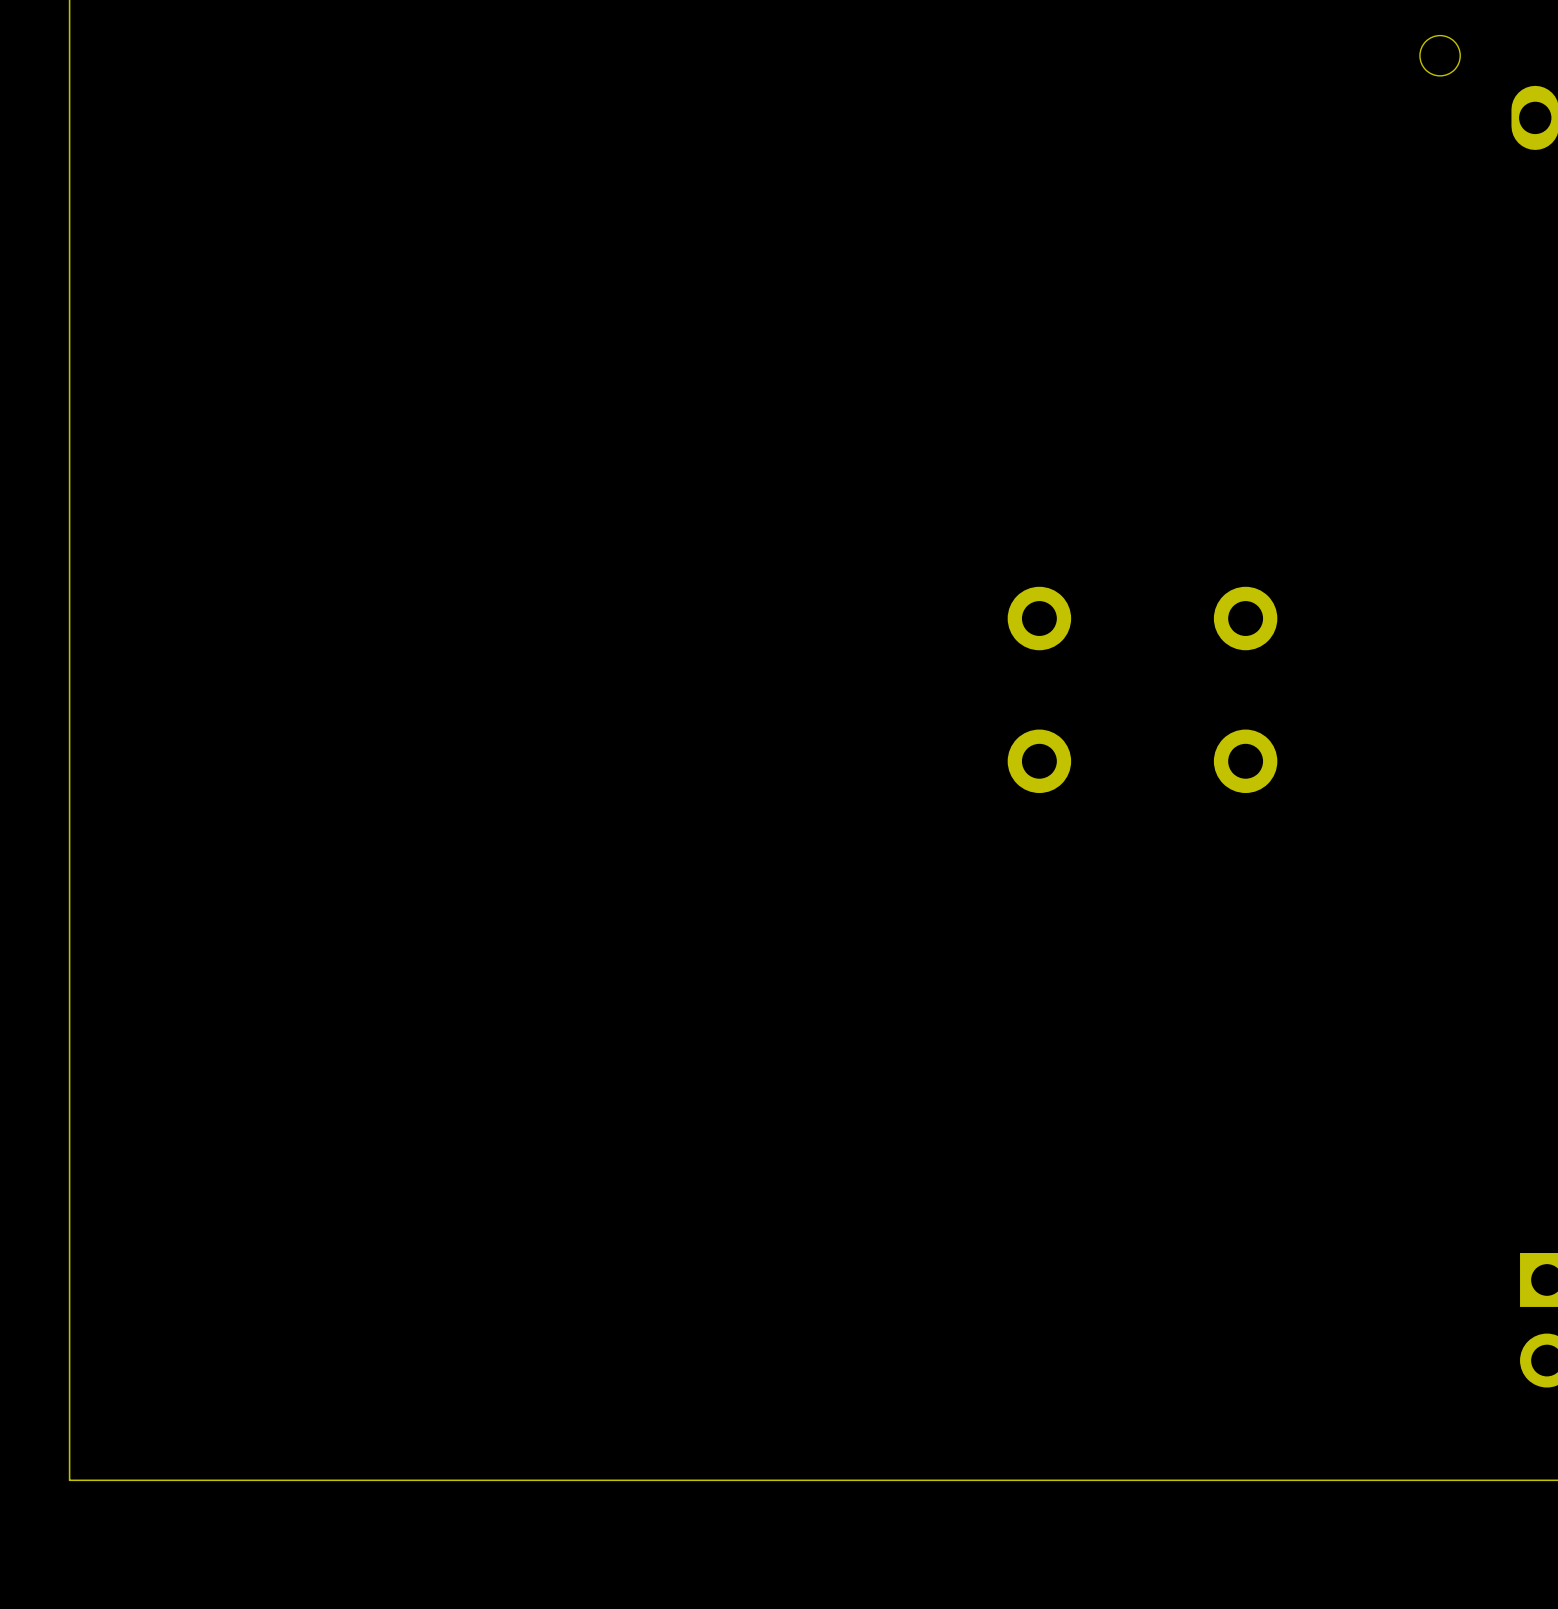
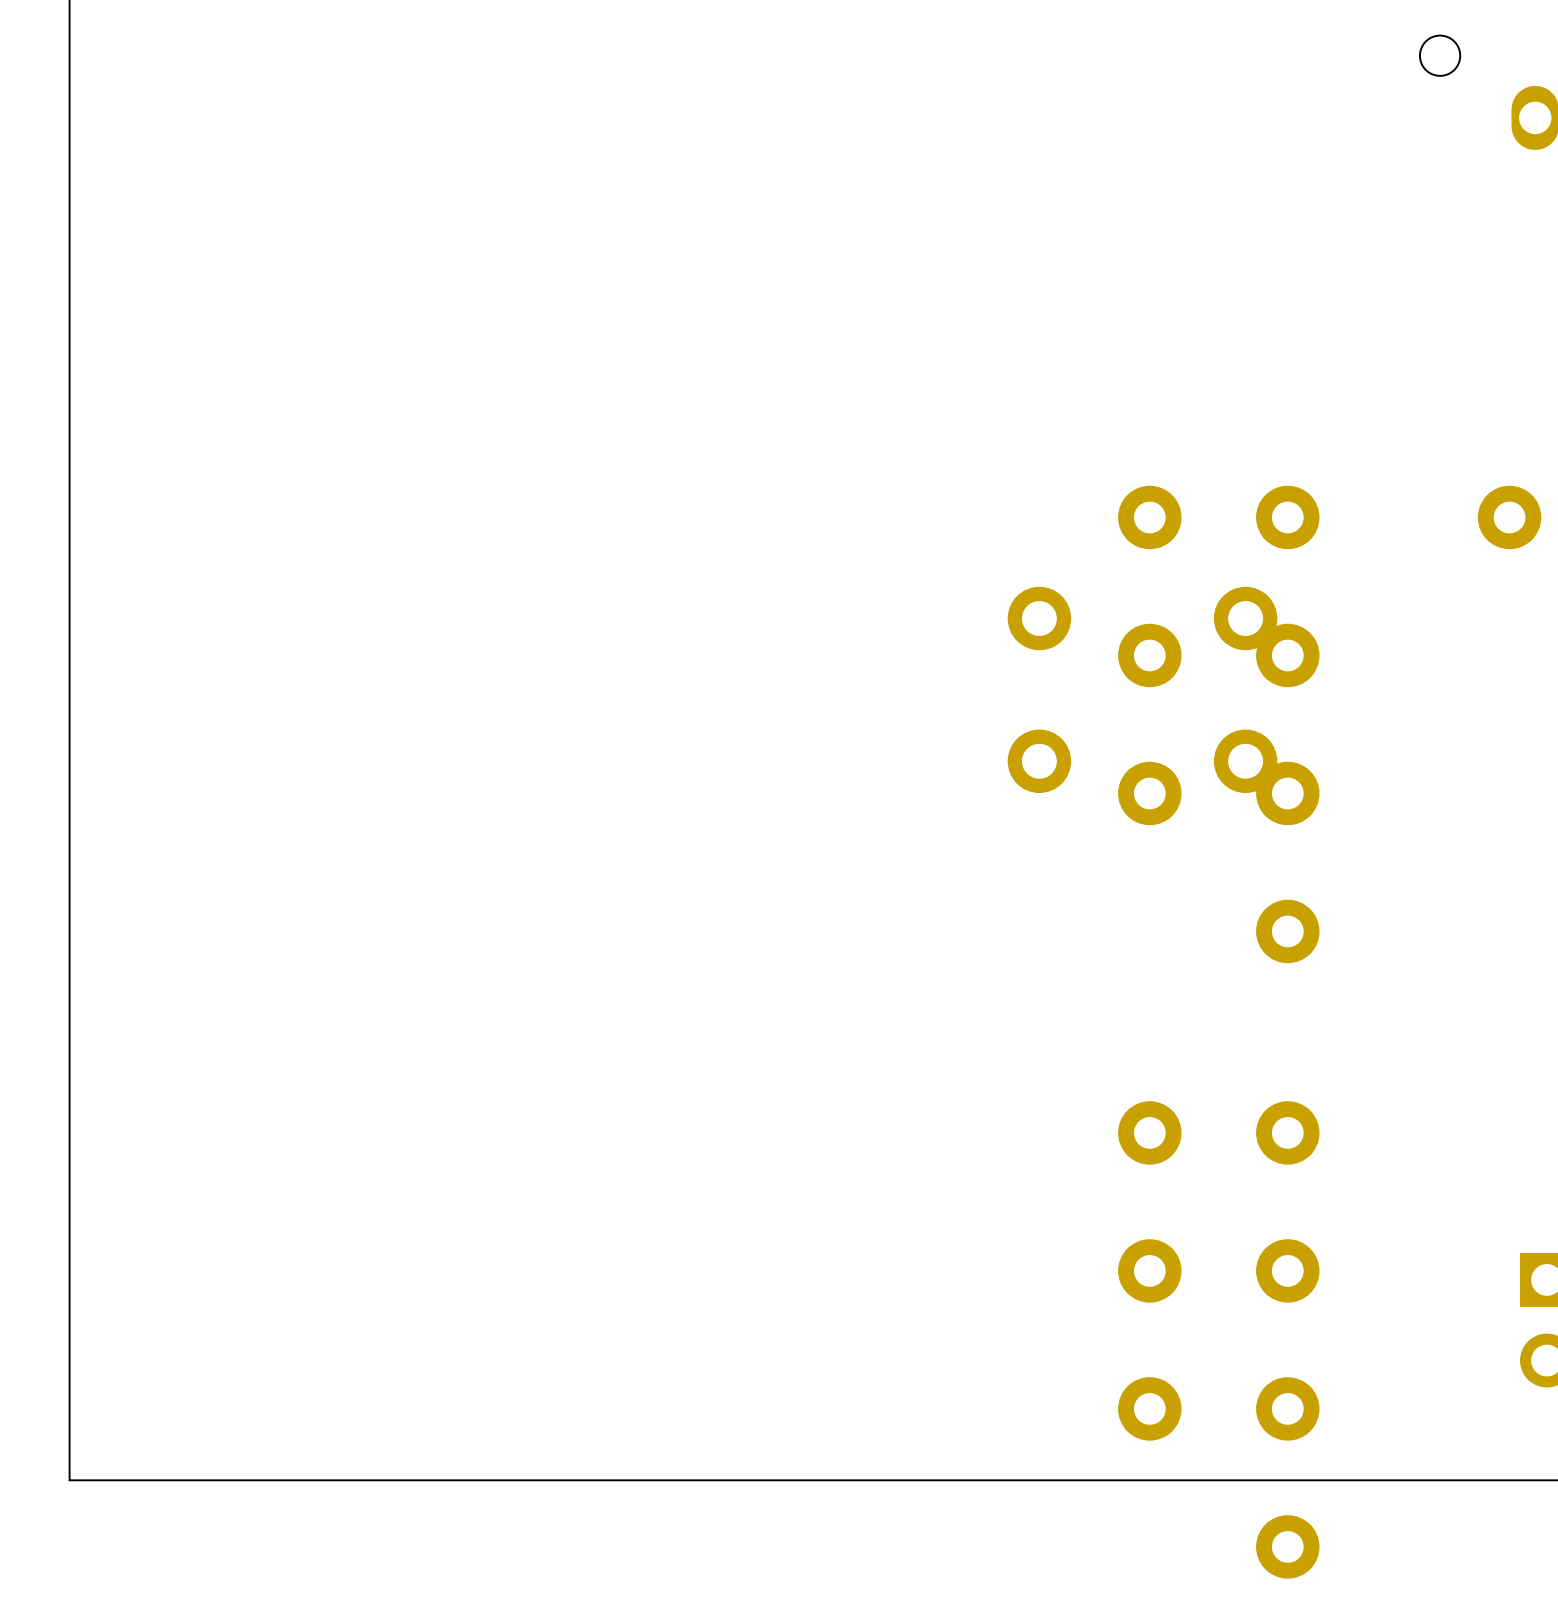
part: none -> (1149, 517)
part: none -> (1287, 517)
part: none -> (1509, 517)
part: none -> (1149, 655)
part: none -> (1287, 655)
part: none -> (1149, 793)
part: none -> (1287, 793)
part: none -> (1287, 931)
part: none -> (1149, 1132)
part: none -> (1287, 1132)
part: none -> (1149, 1270)
part: none -> (1287, 1270)
part: none -> (1149, 1408)
part: none -> (1287, 1408)
part: none -> (1287, 1546)

